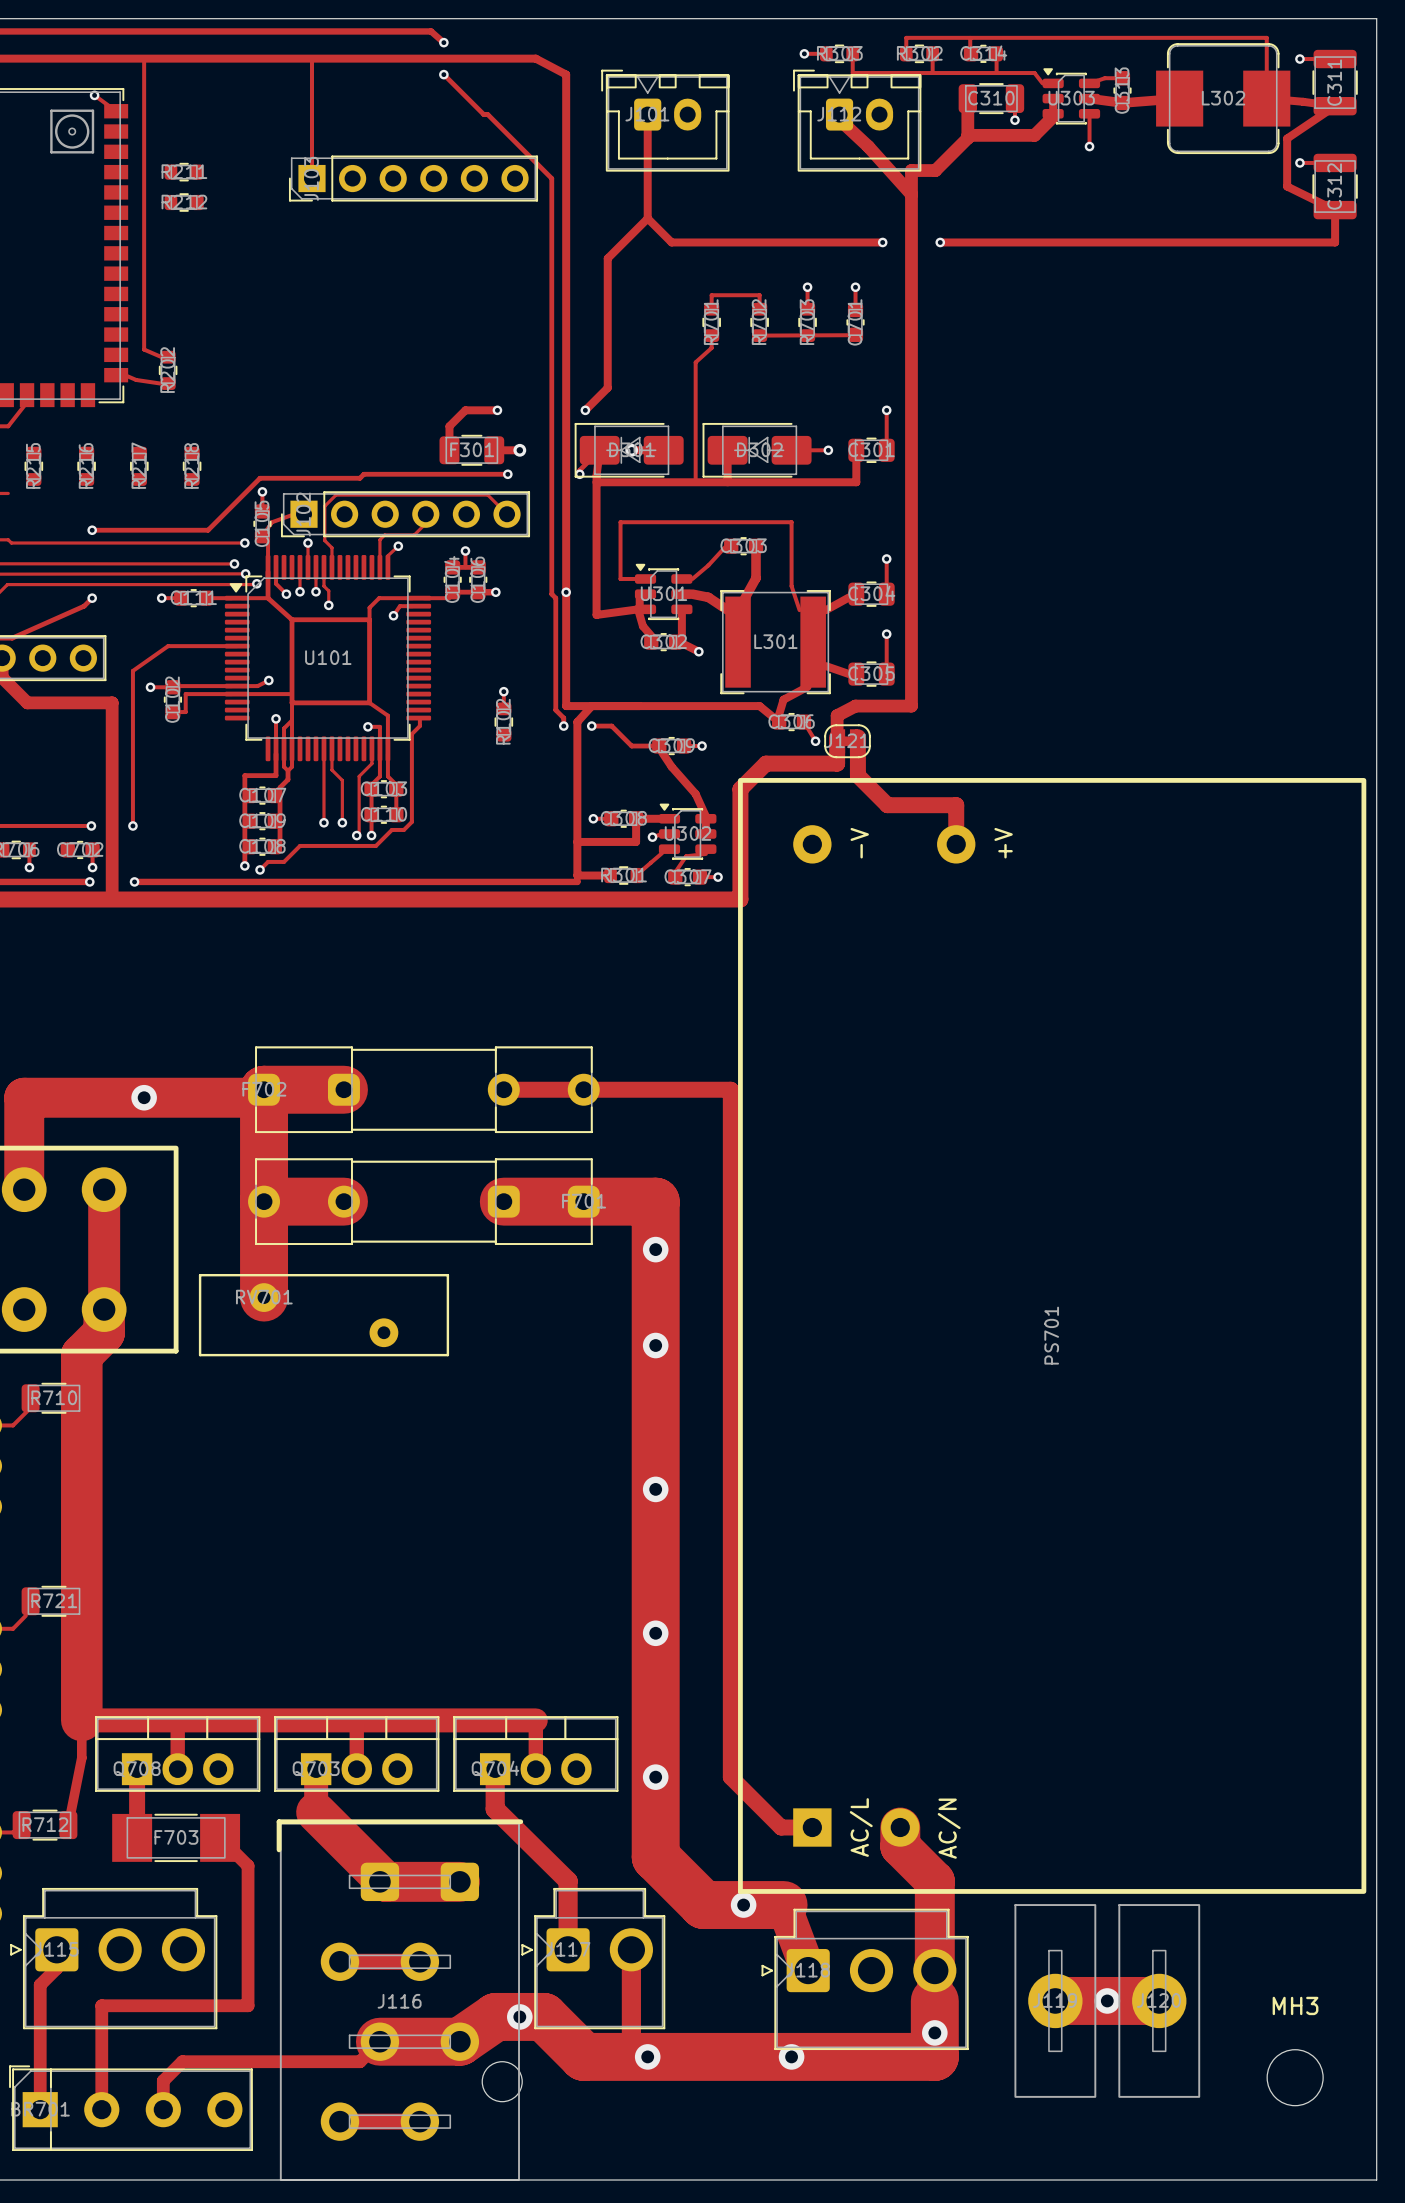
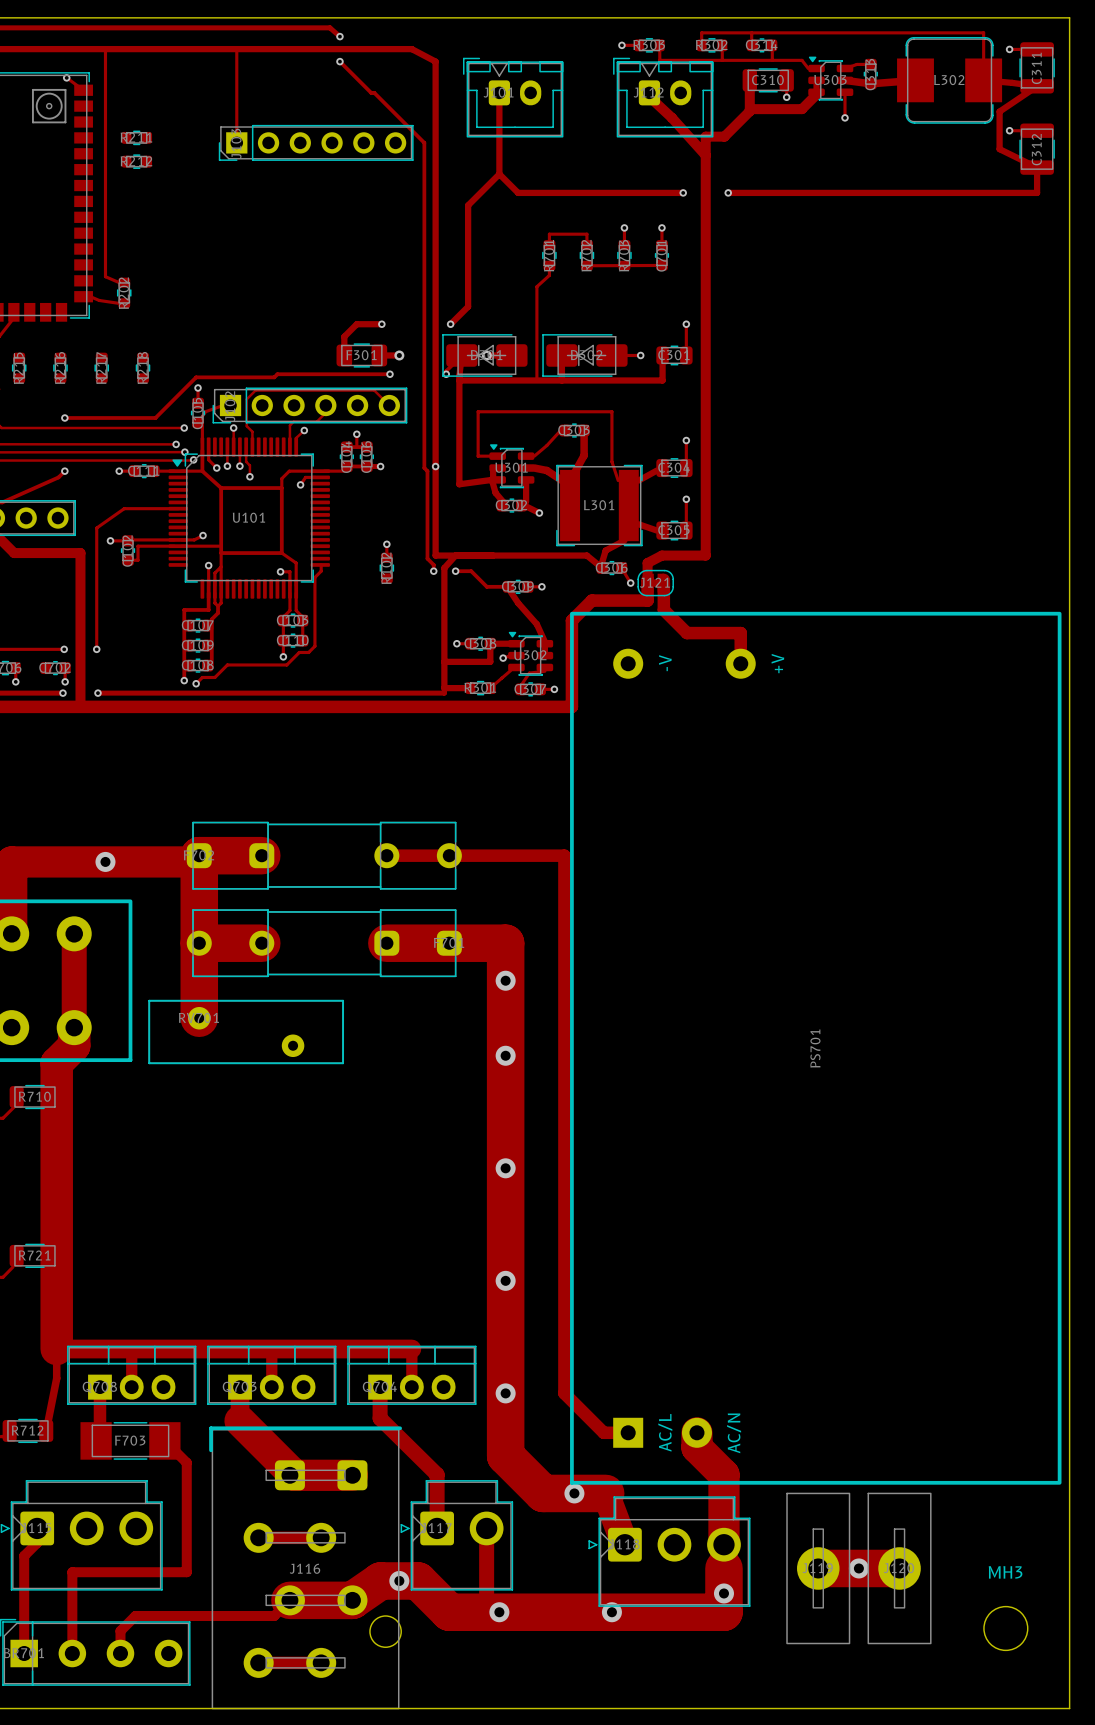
track: (323, 748) (323, 822) -> none
track: (331, 748) (331, 770) (342, 780) (342, 822) -> none
track: (371, 748) (371, 763) (359, 776) (359, 833) (356, 835) -> none
via: (323, 822) -> none
via: (342, 822) -> none
via: (356, 835) -> none

